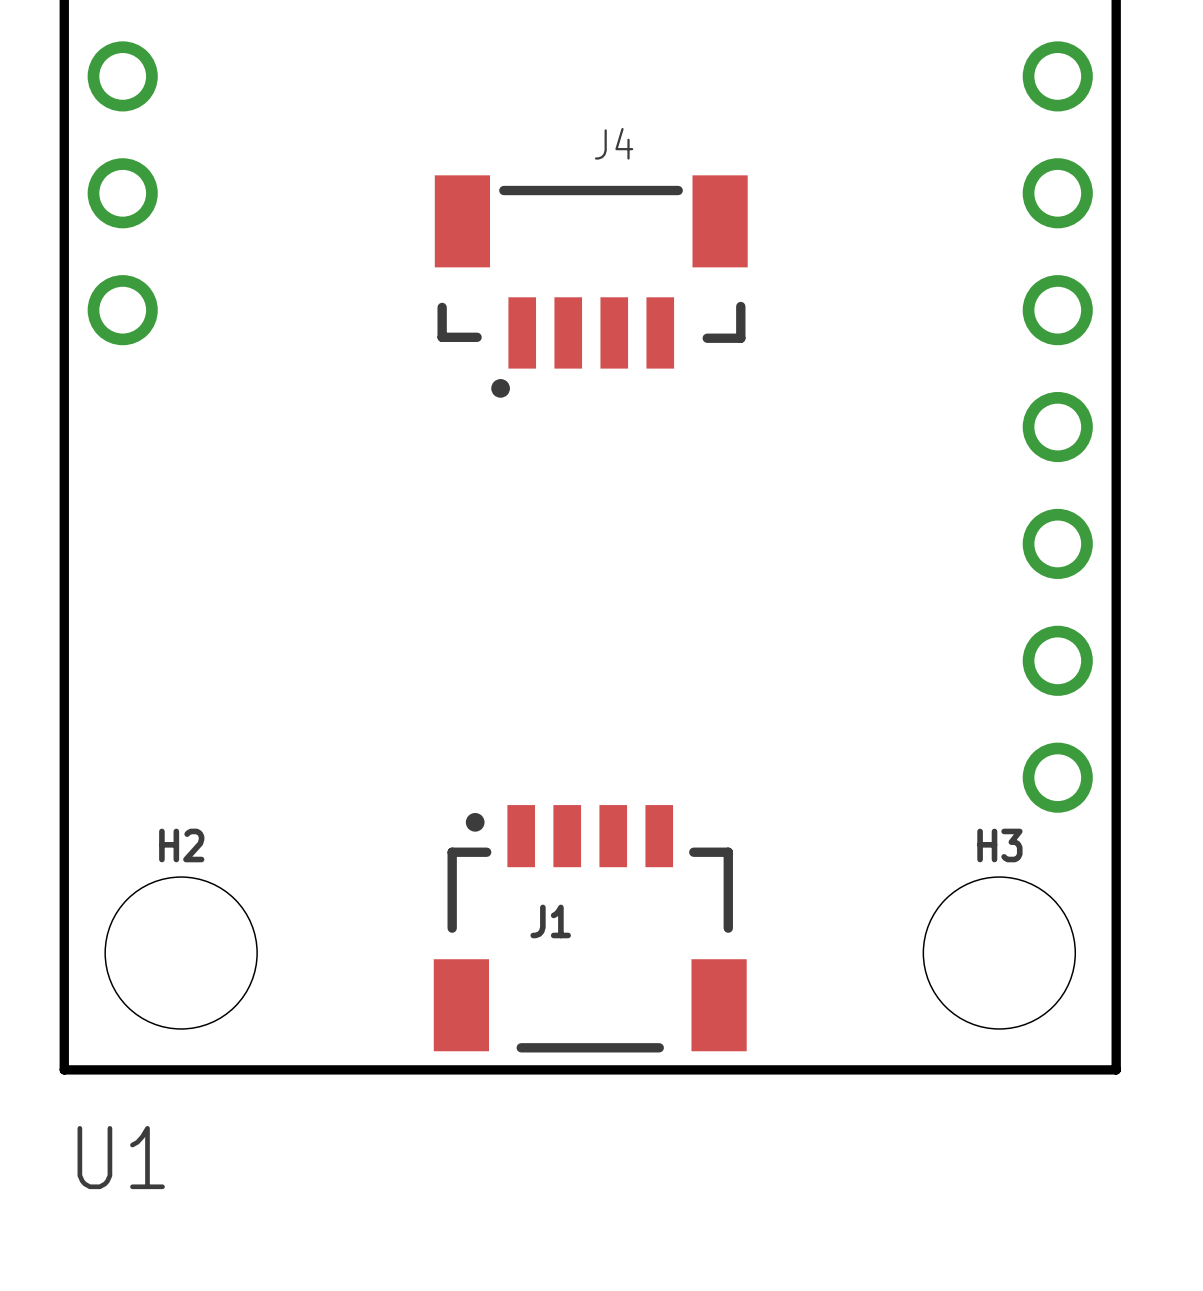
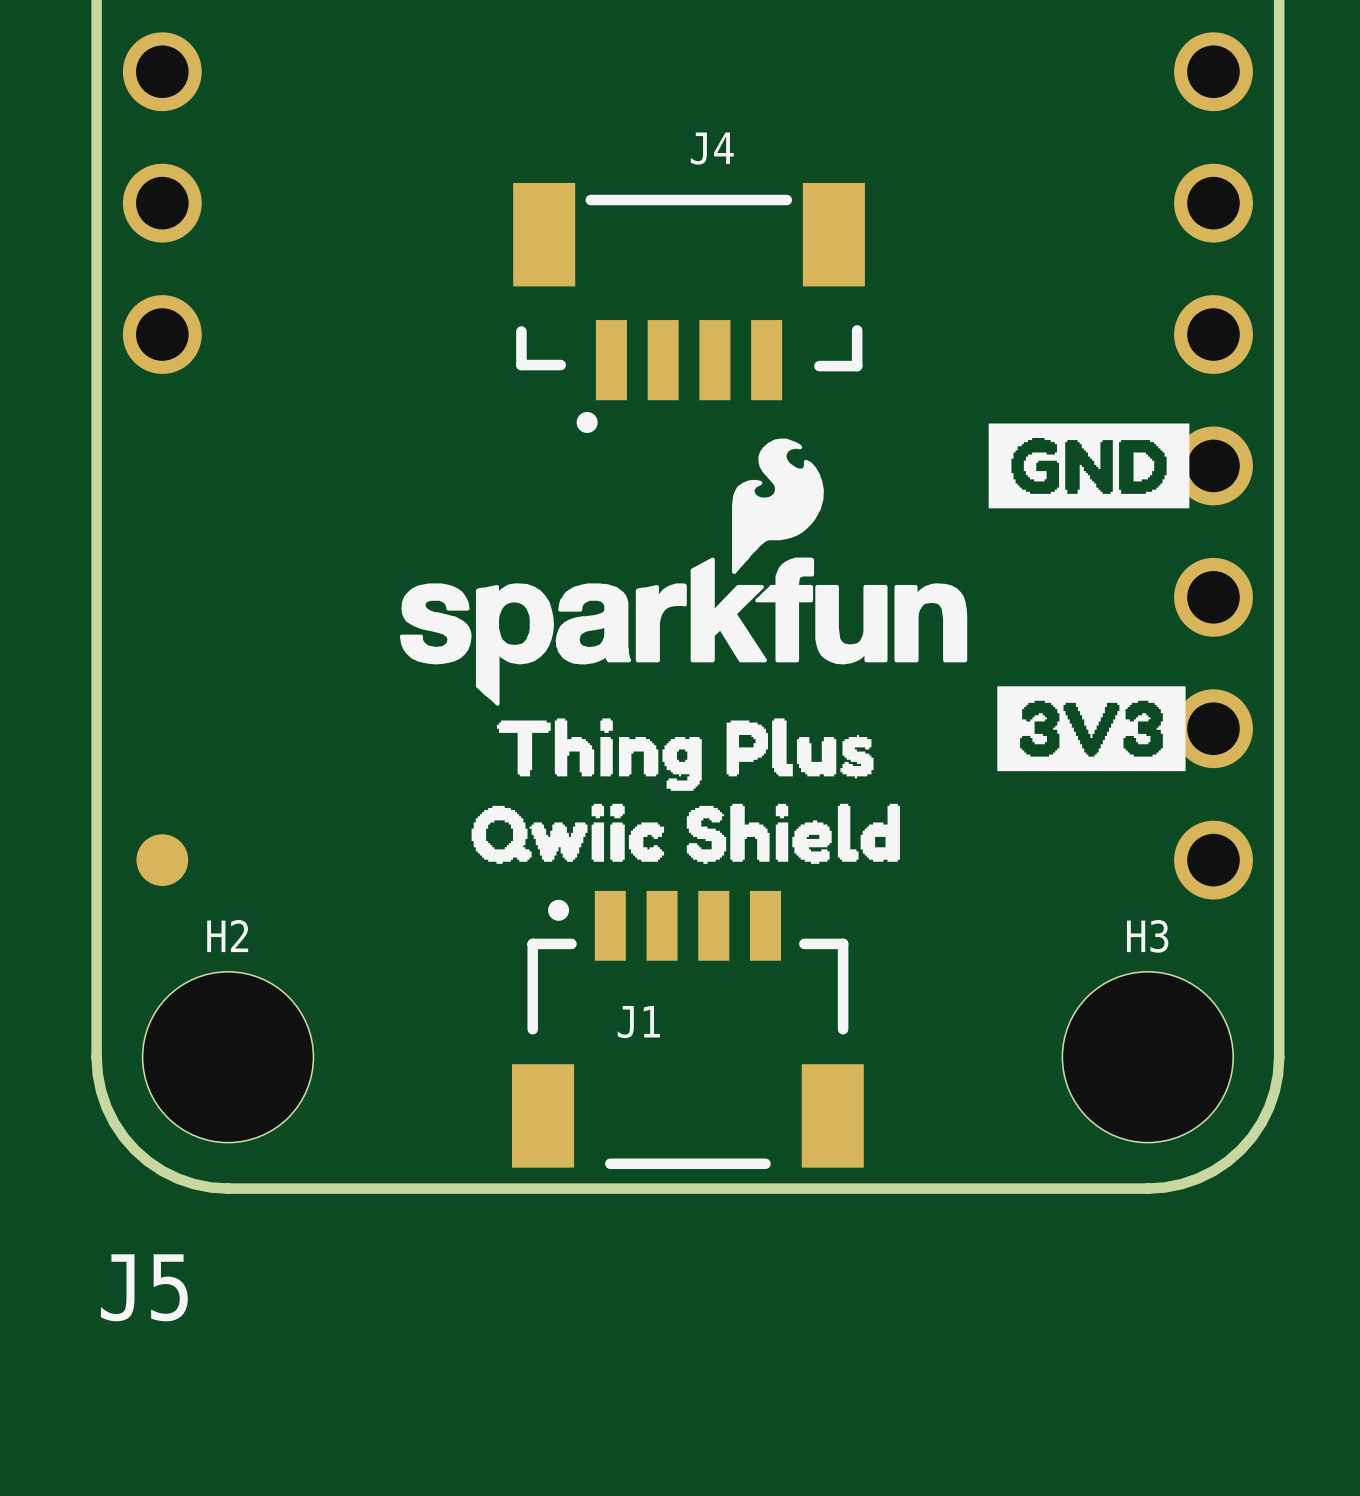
drawing: none -> [399, 423, 1190, 864]
part: none -> (162, 860)
board edge: (64, 953) (64, 1069) (181, 1069) -> (96, 1057) (101, 1091) (106, 1107) (123, 1137) (135, 1150) (148, 1161) (177, 1178) (194, 1184) (228, 1188)
board edge: (1116, 953) (1116, 1069) (999, 1069) -> (1279, 1057) (1274, 1091) (1269, 1107) (1252, 1137) (1240, 1150) (1227, 1161) (1198, 1178) (1181, 1184) (1147, 1188)
U1 name: U1 (121, 1157) -> J5 (144, 1287)

